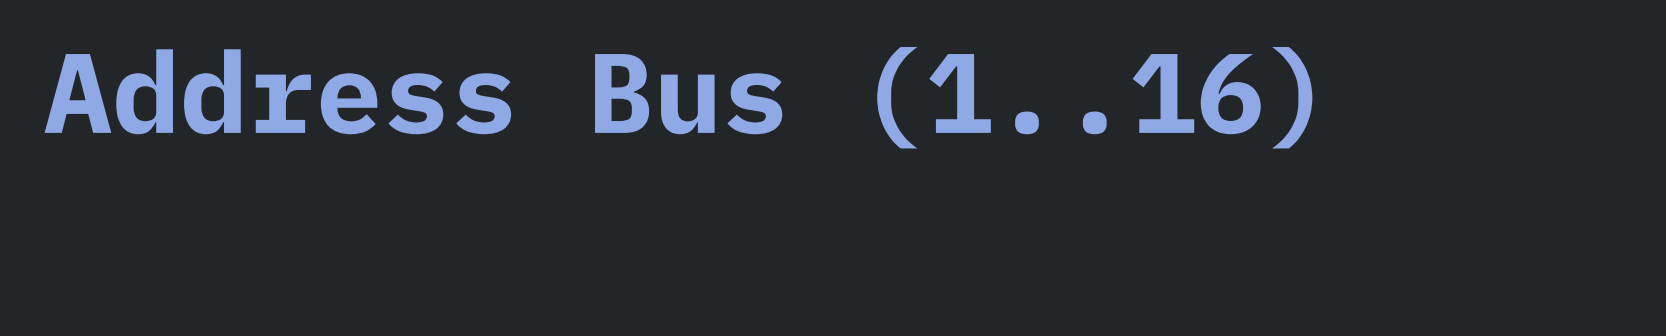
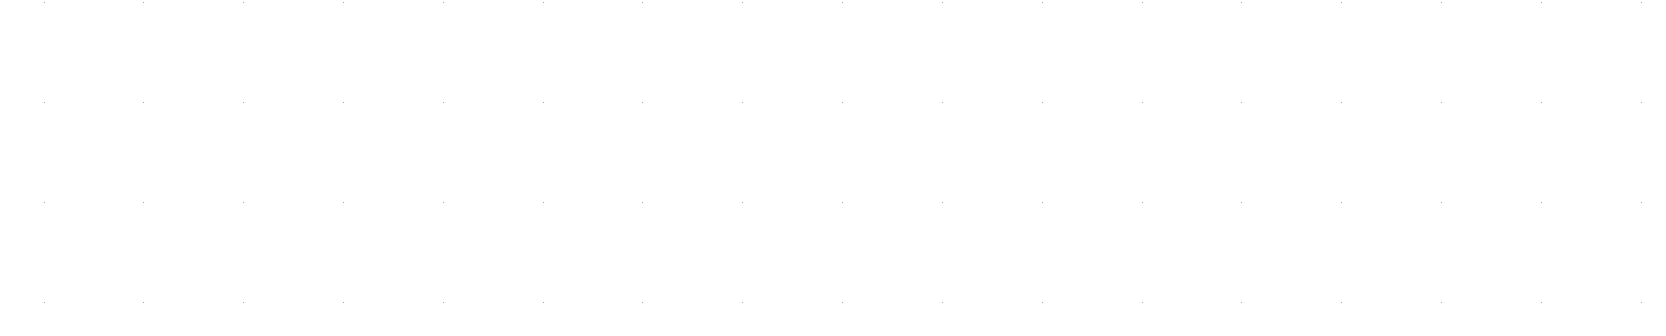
text: Address Bus (1..16) (678, 97) -> none

